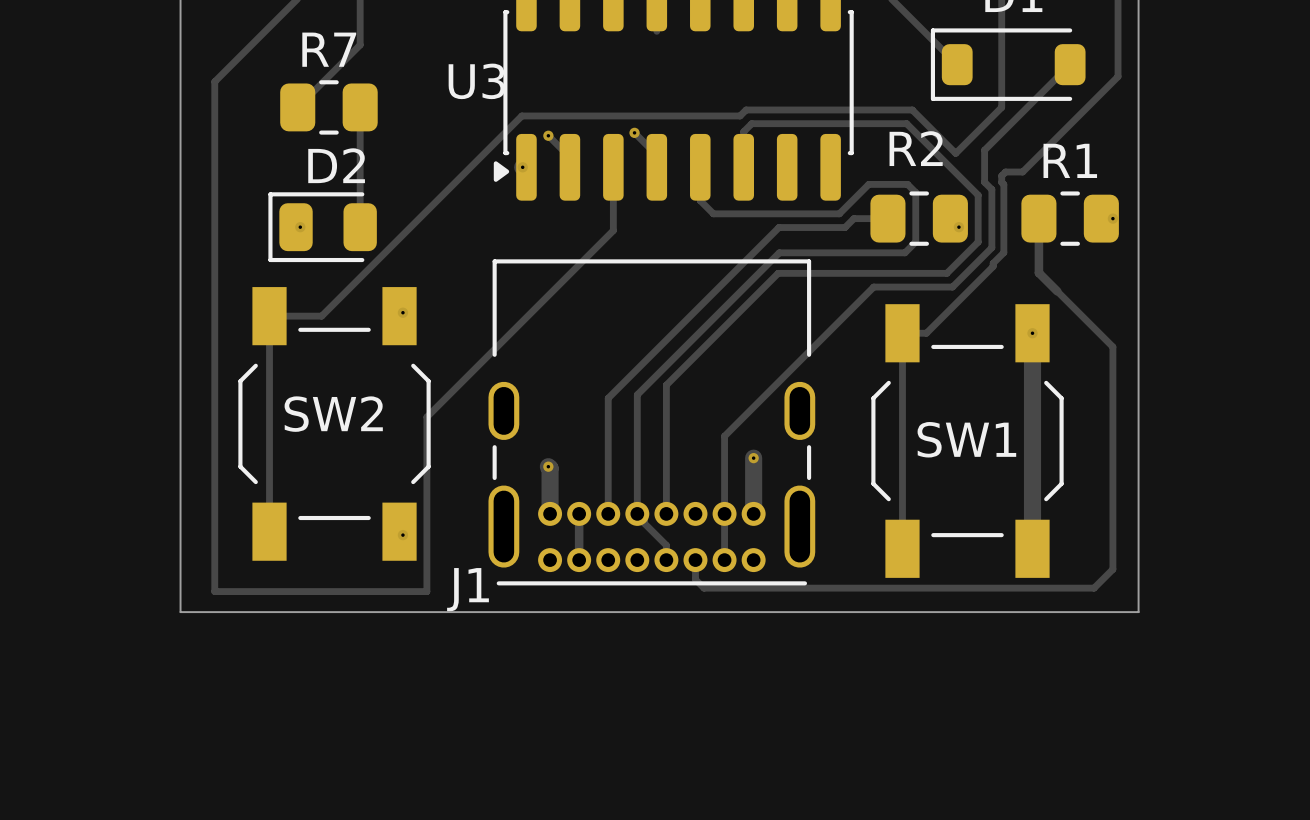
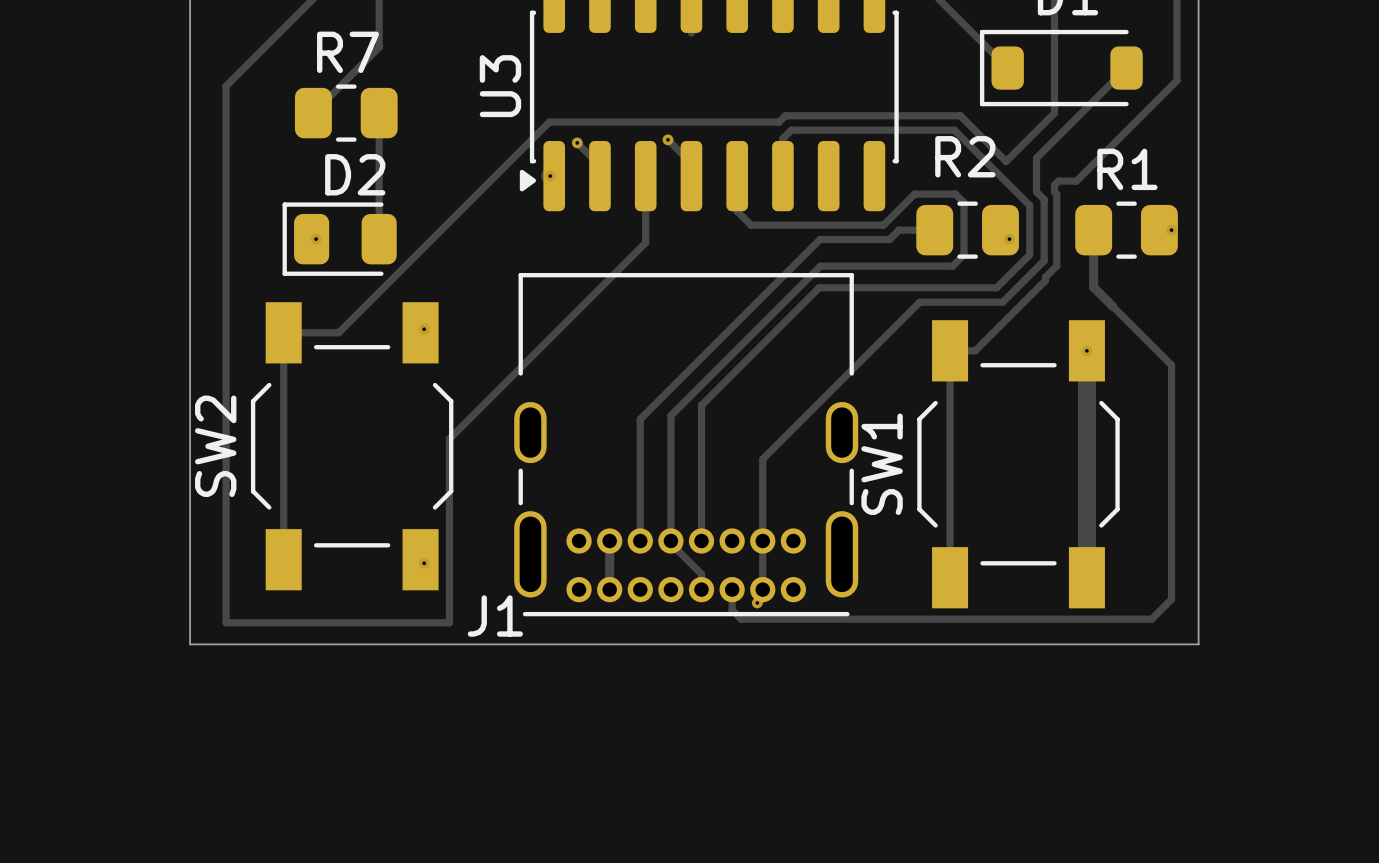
U3 name rotation: 0° (476, 81) -> 90° counterclockwise (500, 86)
SW2 name rotation: 0° (333, 414) -> 90° counterclockwise (215, 446)
SW1 name rotation: 0° (966, 439) -> 90° counterclockwise (882, 464)
track: (753, 458) (753, 513) -> none
via: (753, 458) -> none
track: (548, 466) (550, 468) (550, 513) -> none
via: (548, 466) -> none
via: none -> (757, 602)

